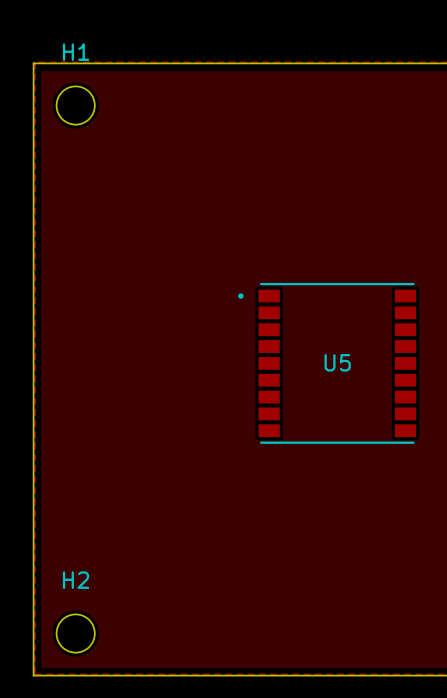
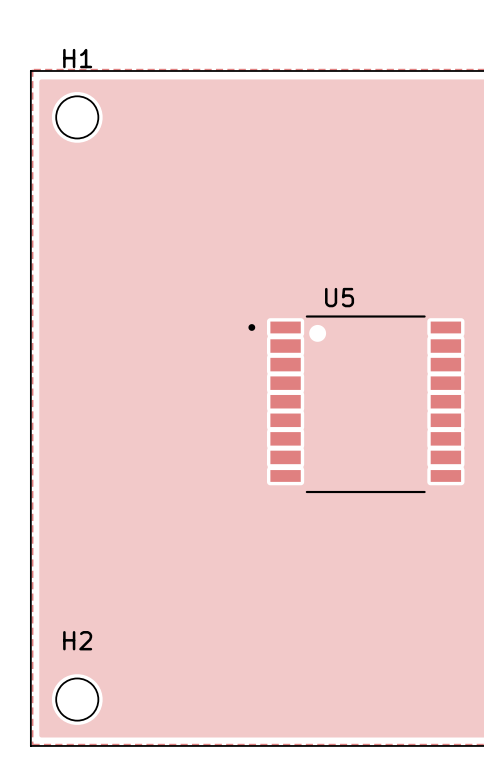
U5 footprint: [238, 282, 417, 444] -> [248, 315, 462, 494]
U5 name position: U5 (337, 362) -> U5 (339, 297)

